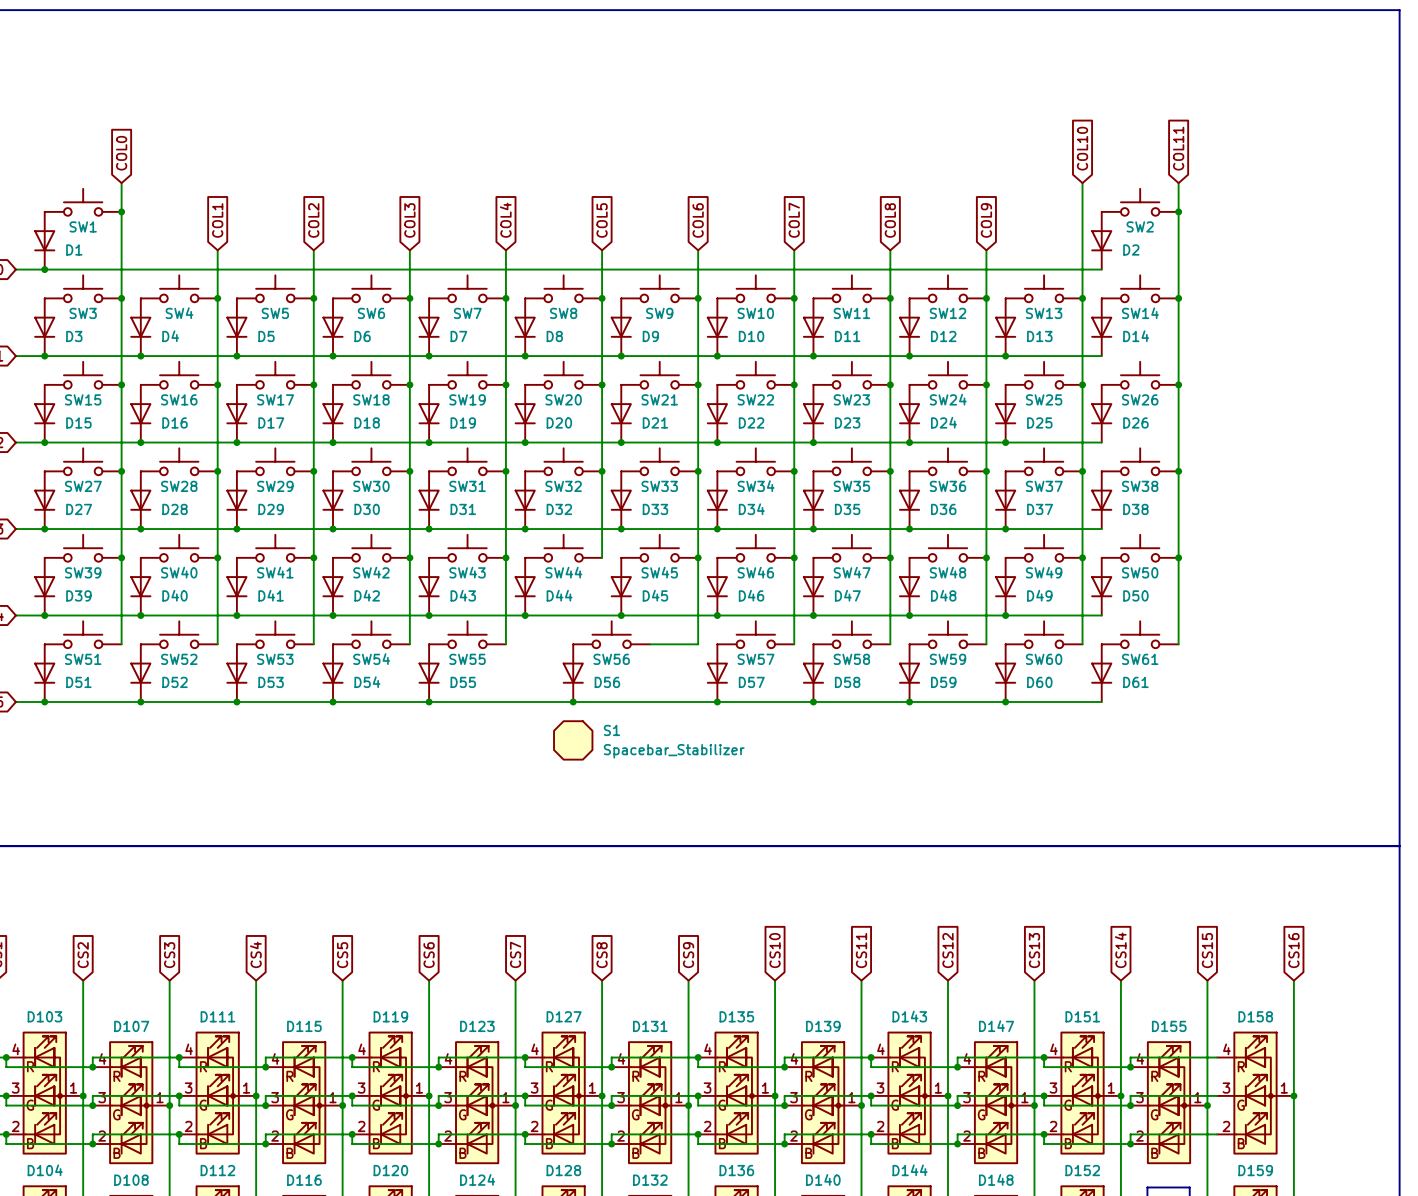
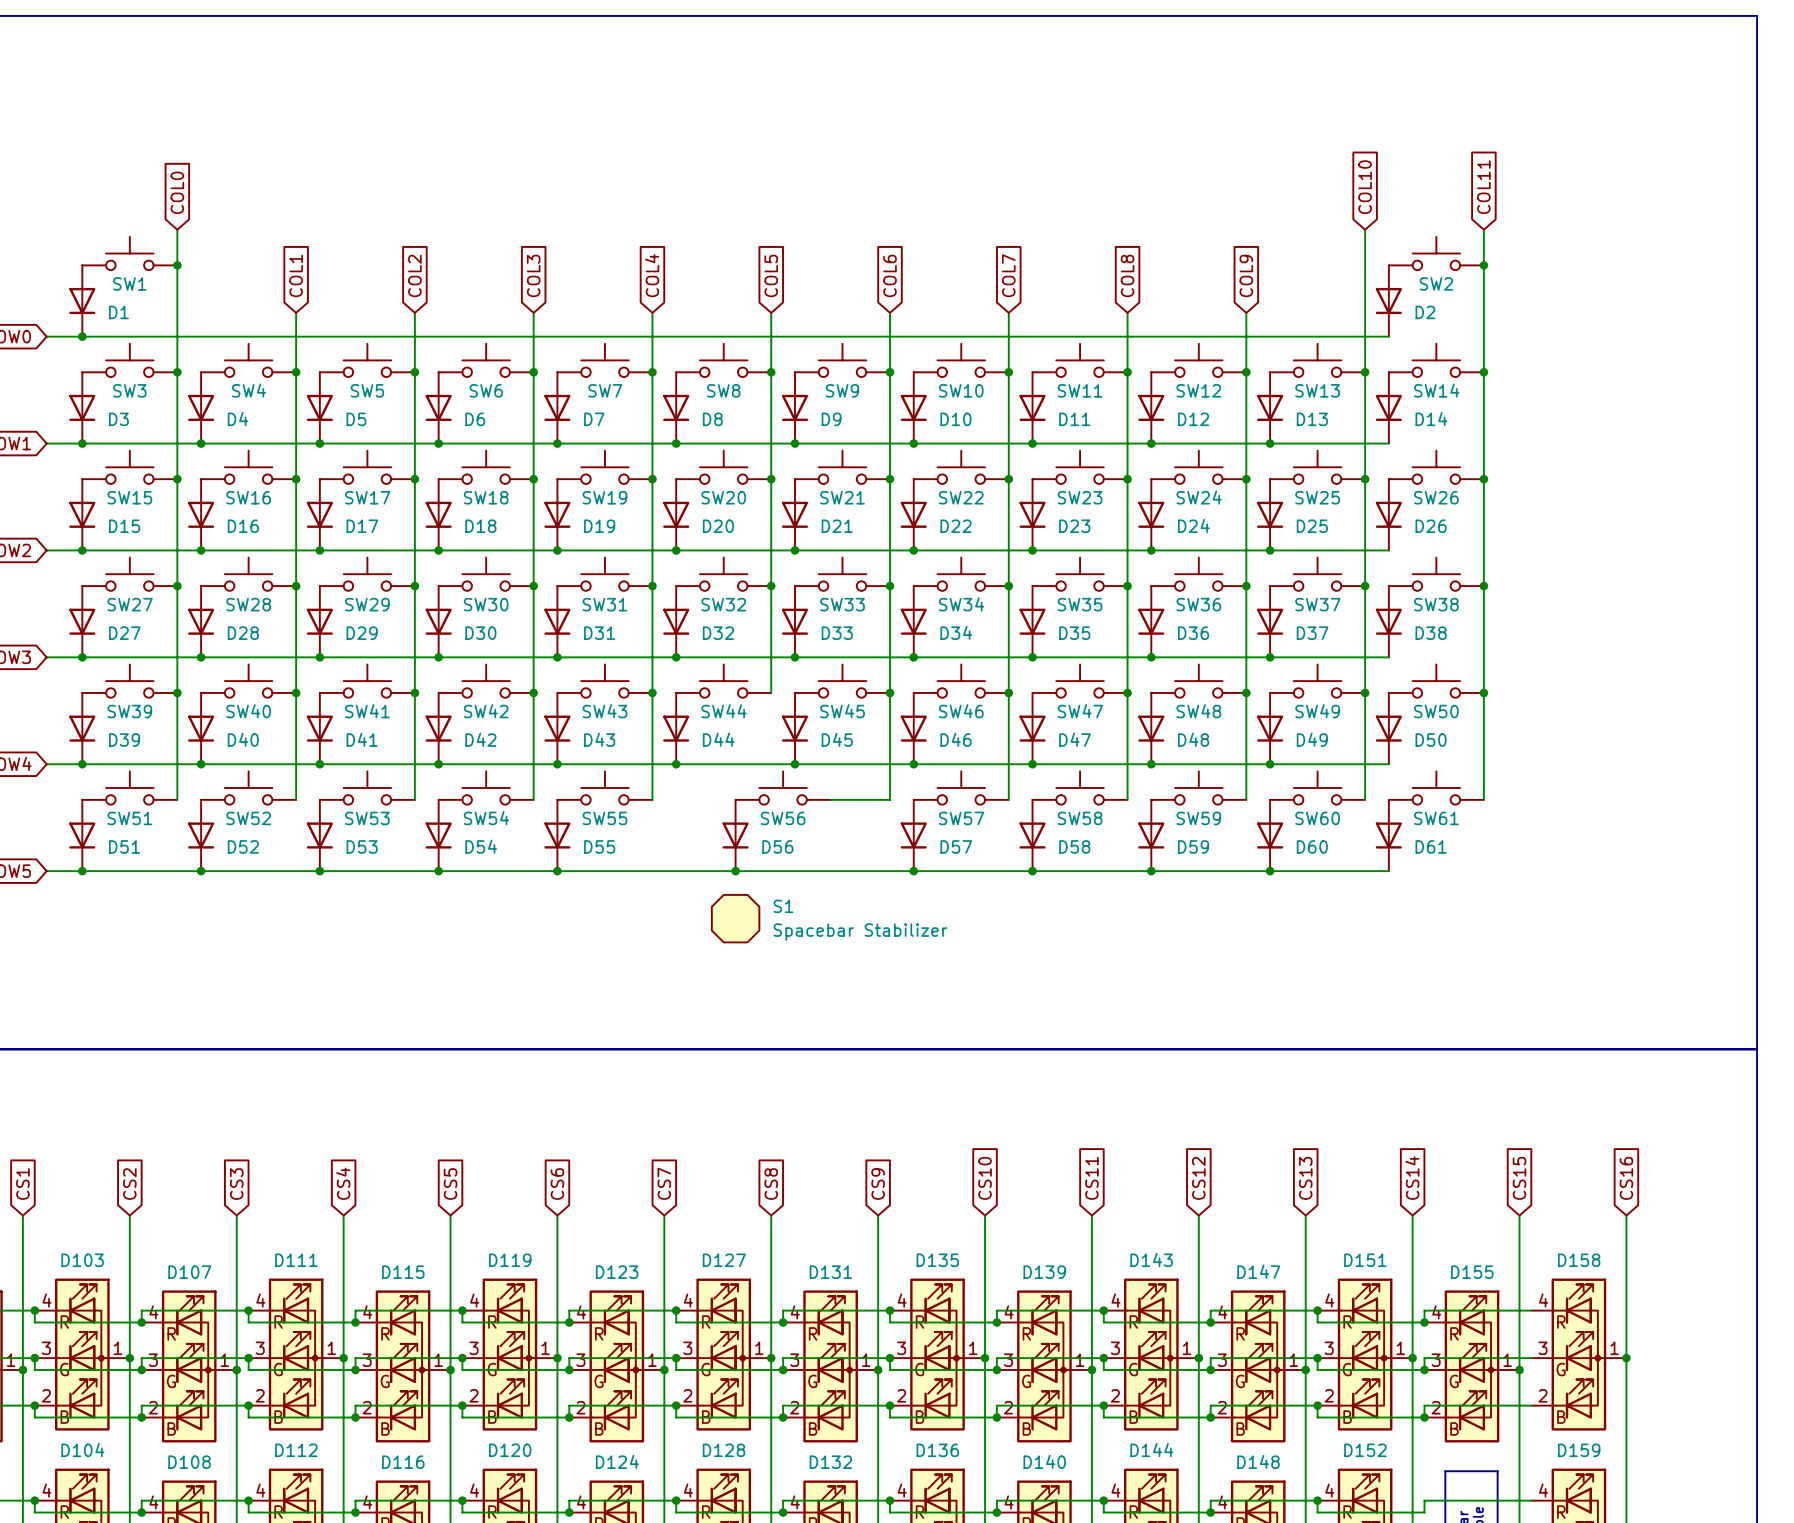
S1 value: Spacebar_Stabilizer (674, 751) -> Spacebar Stabilizer (860, 932)

